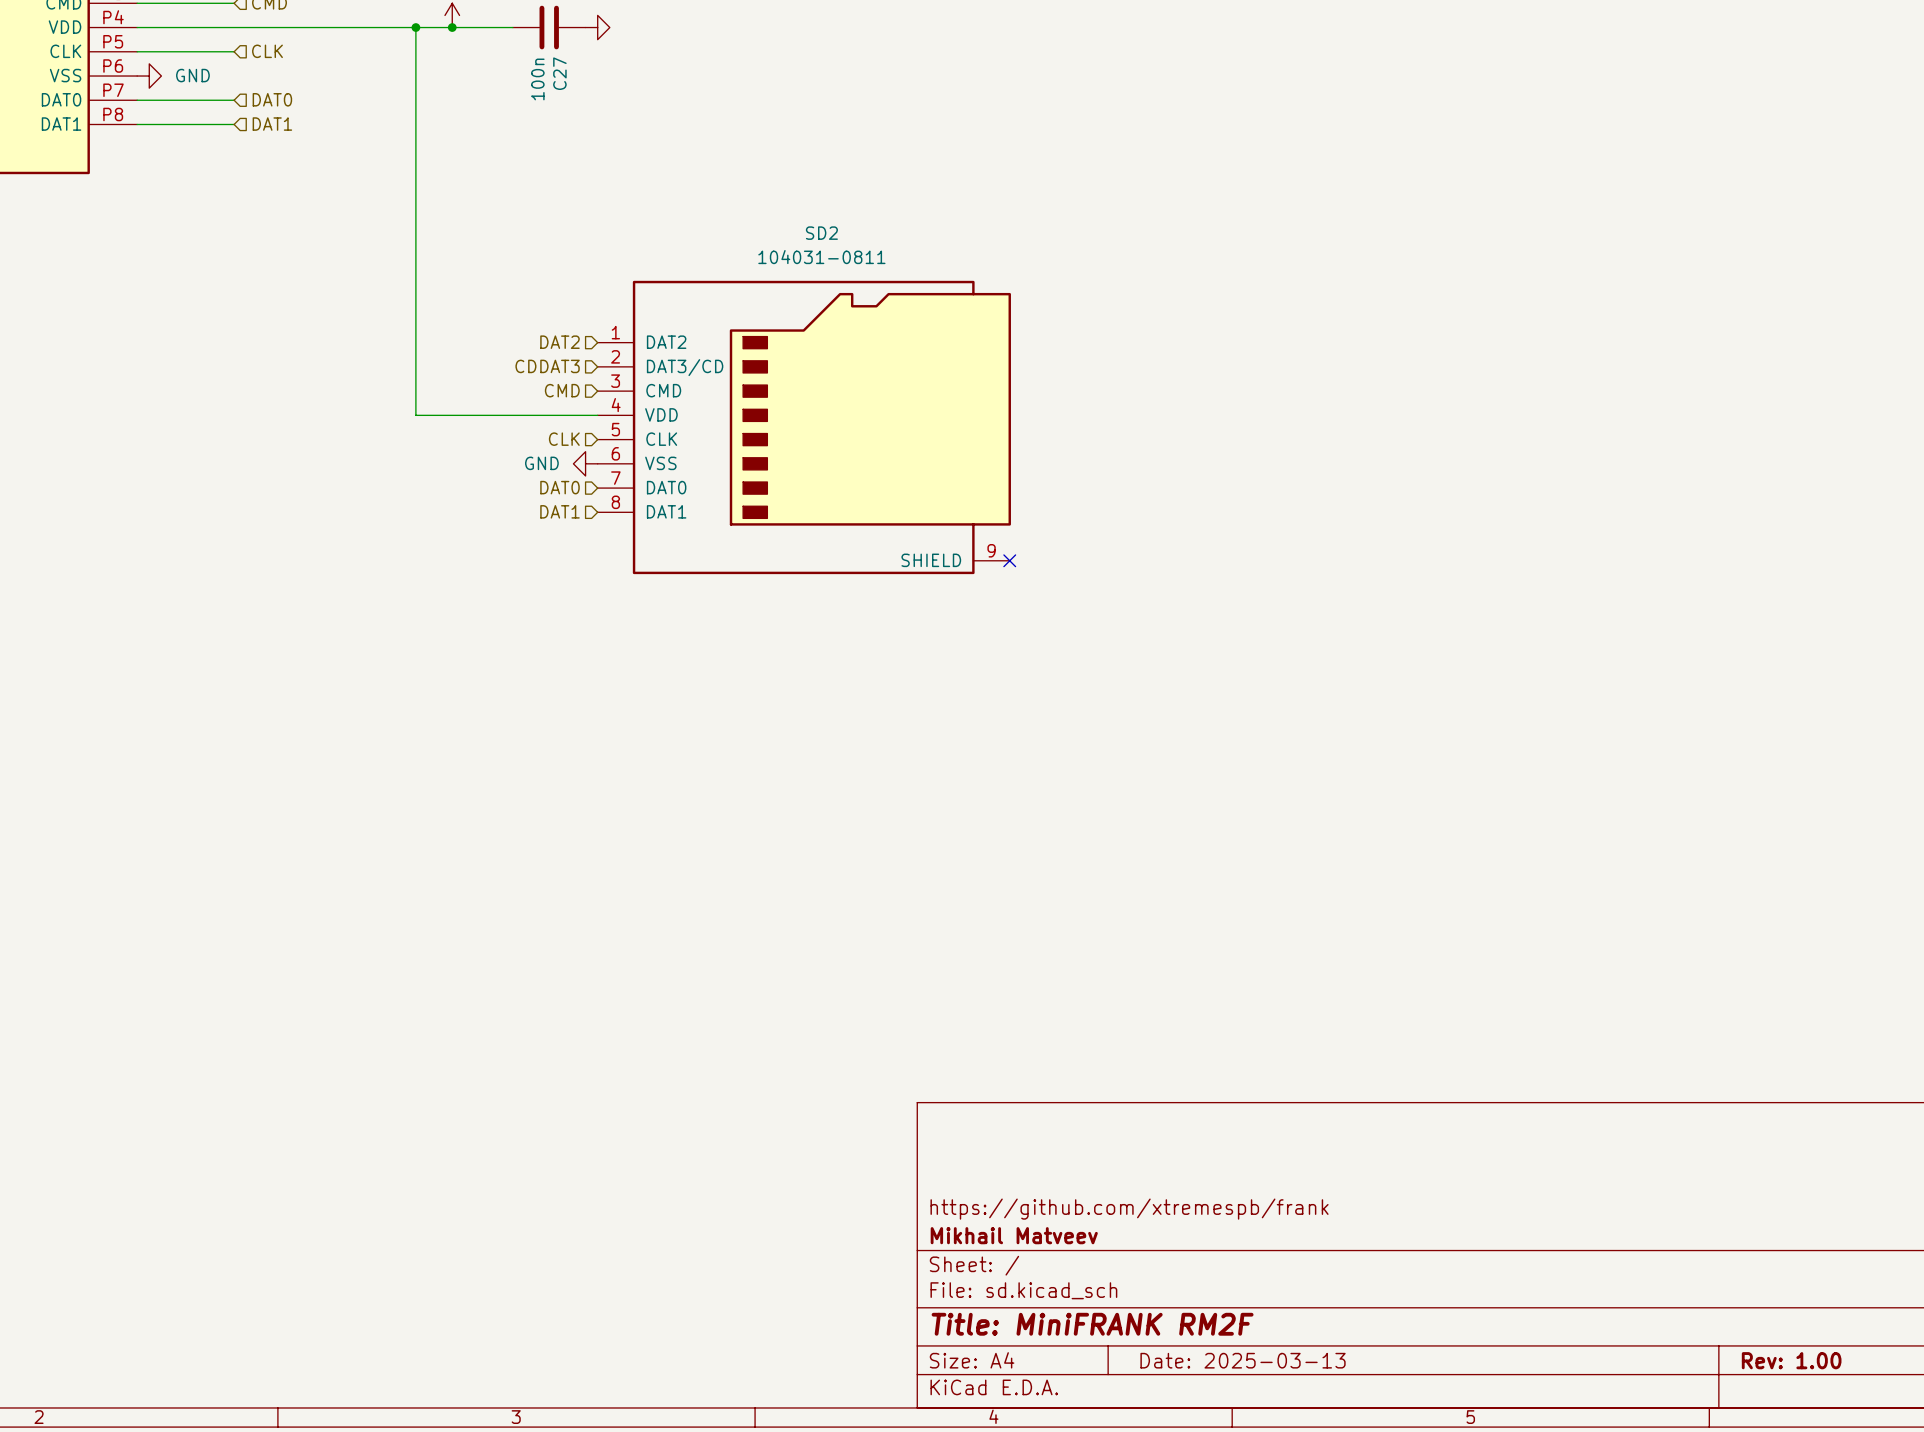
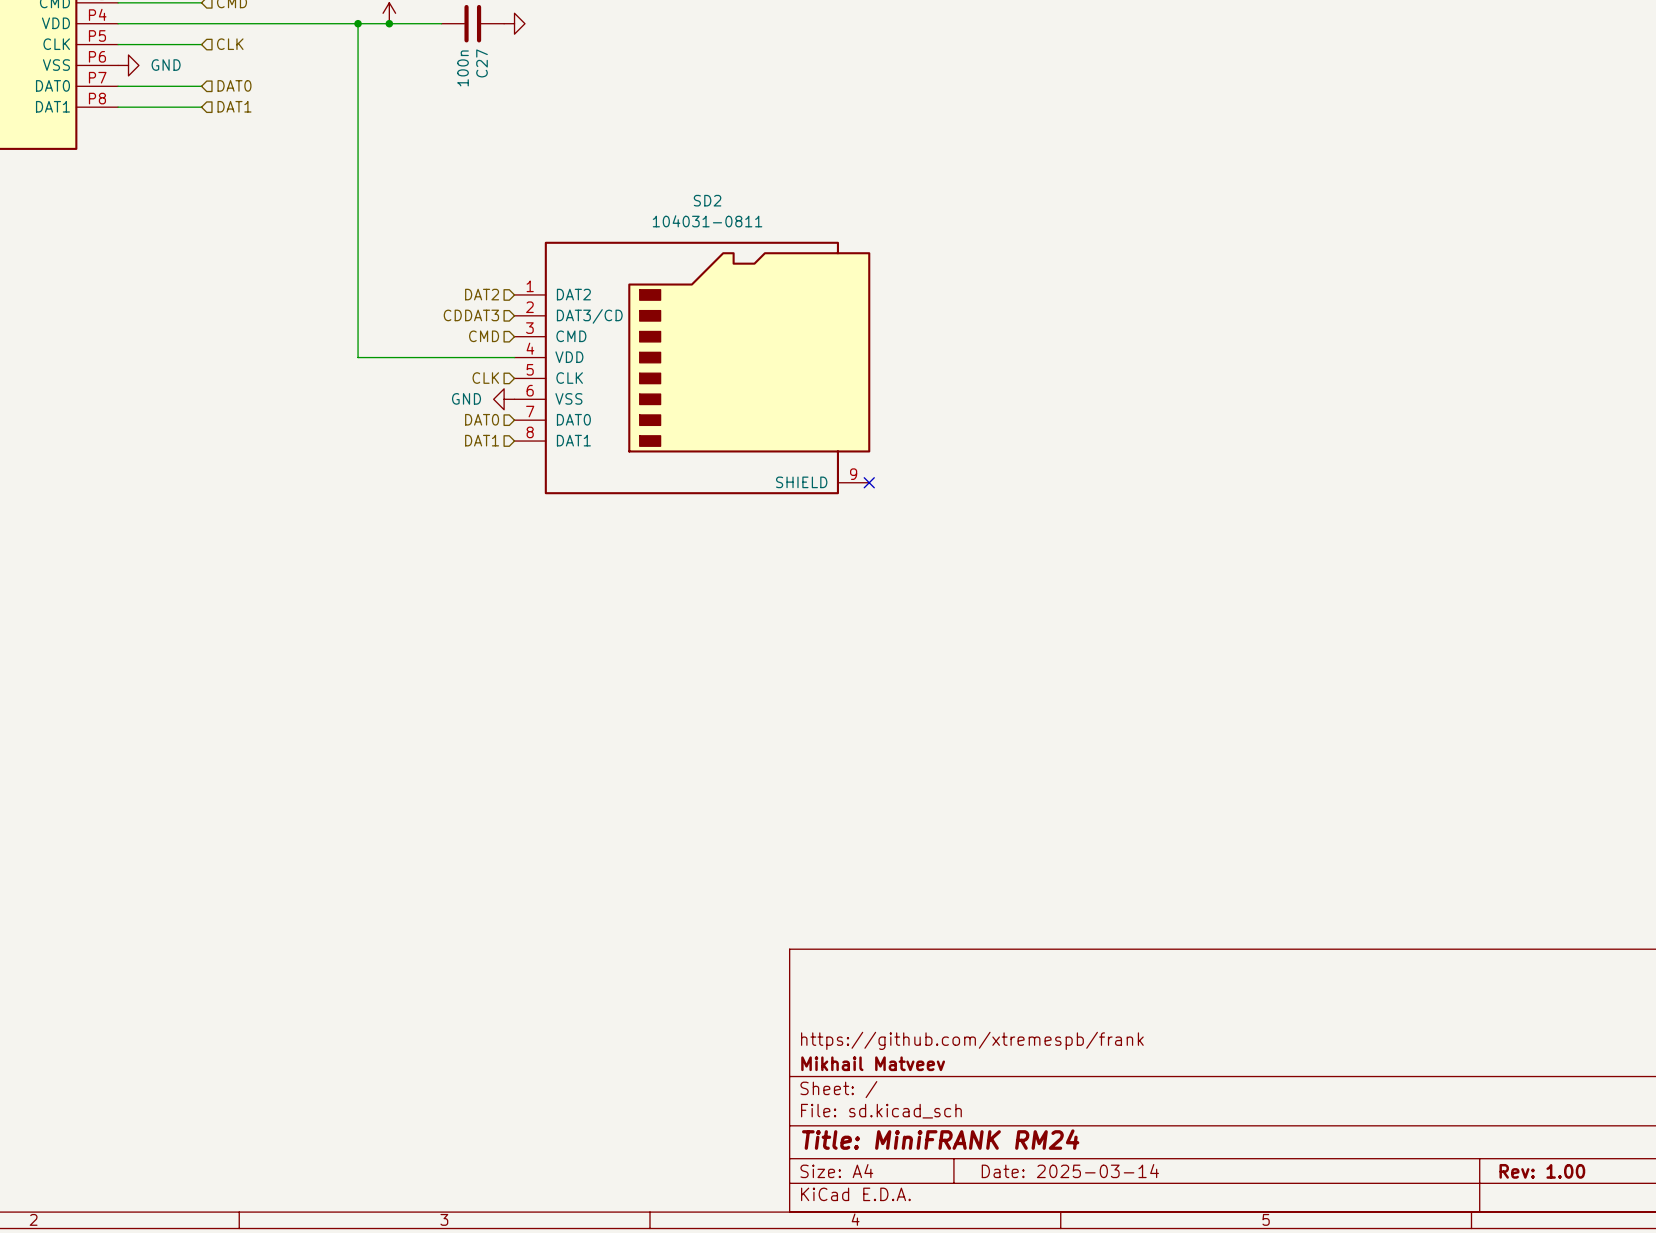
title block: Title: MiniFRANK RM2F (1092, 1324) -> Title: MiniFRANK RM24 (940, 1139)
title block: Date: 2025-03-13 (1243, 1360) -> Date: 2025-03-14 (1070, 1171)

